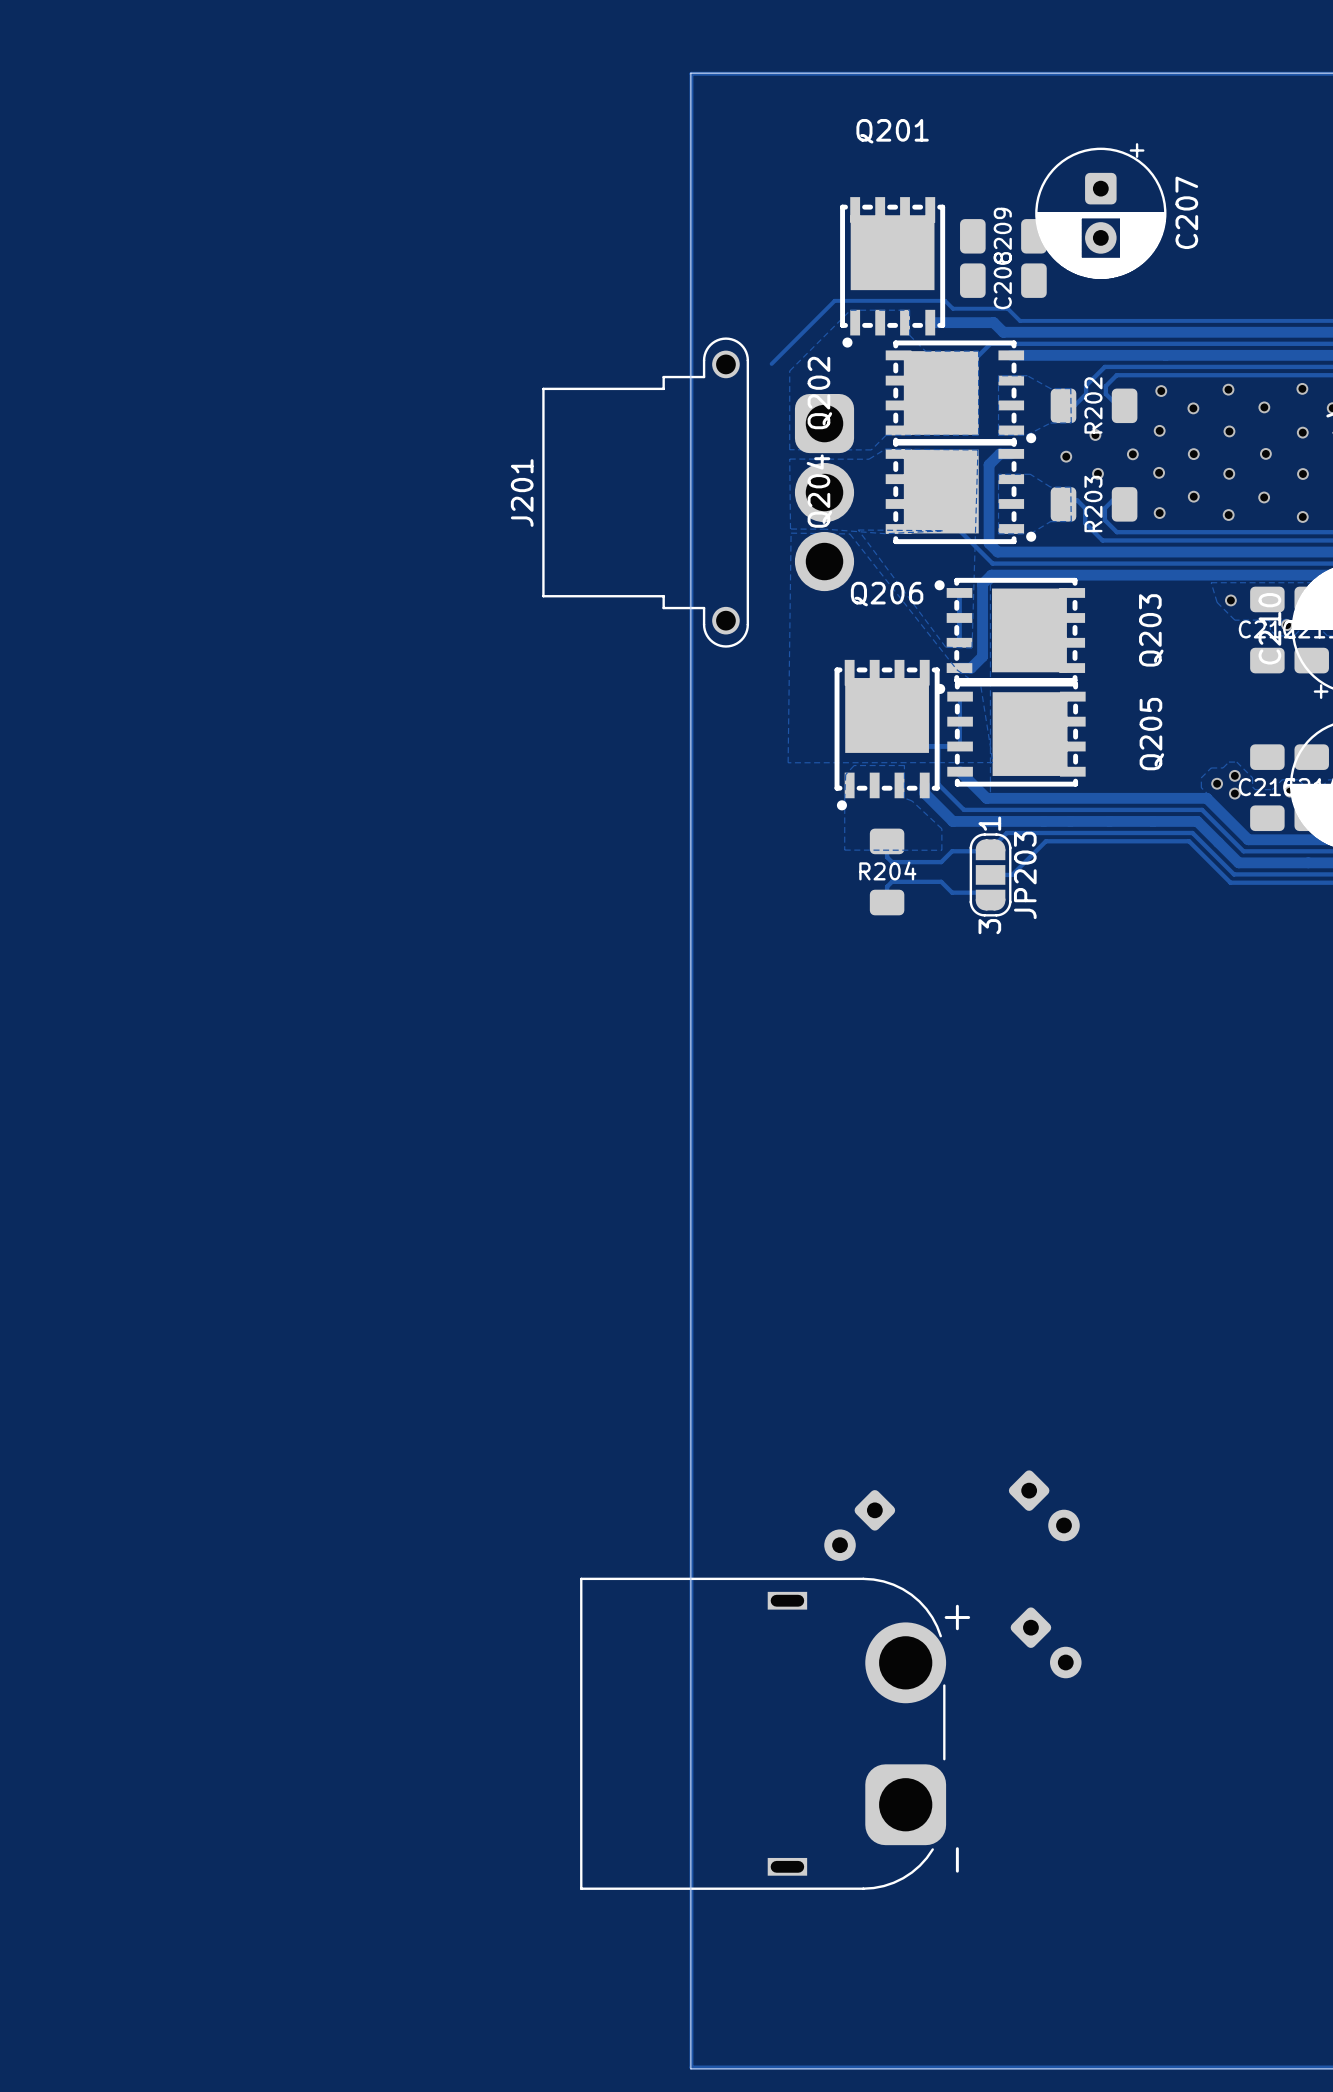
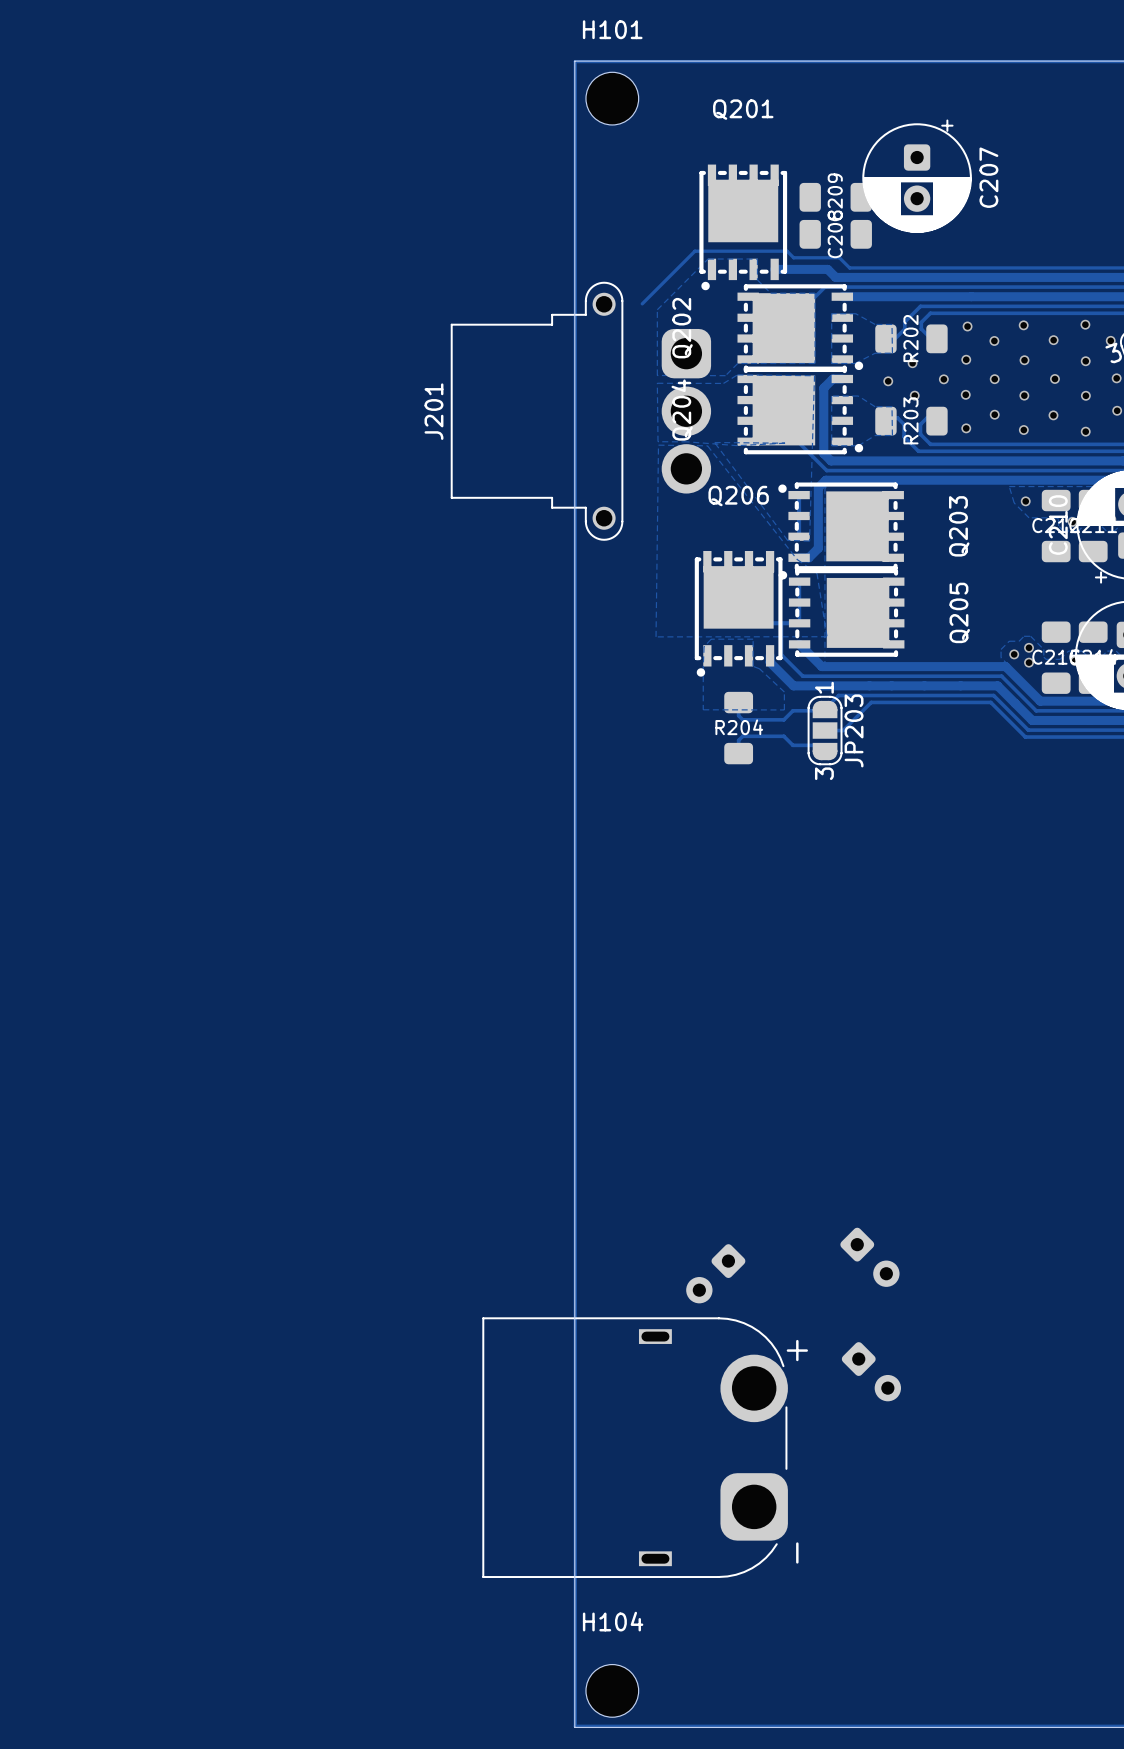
H101: none -> (612, 98)
H104: none -> (612, 1690)

